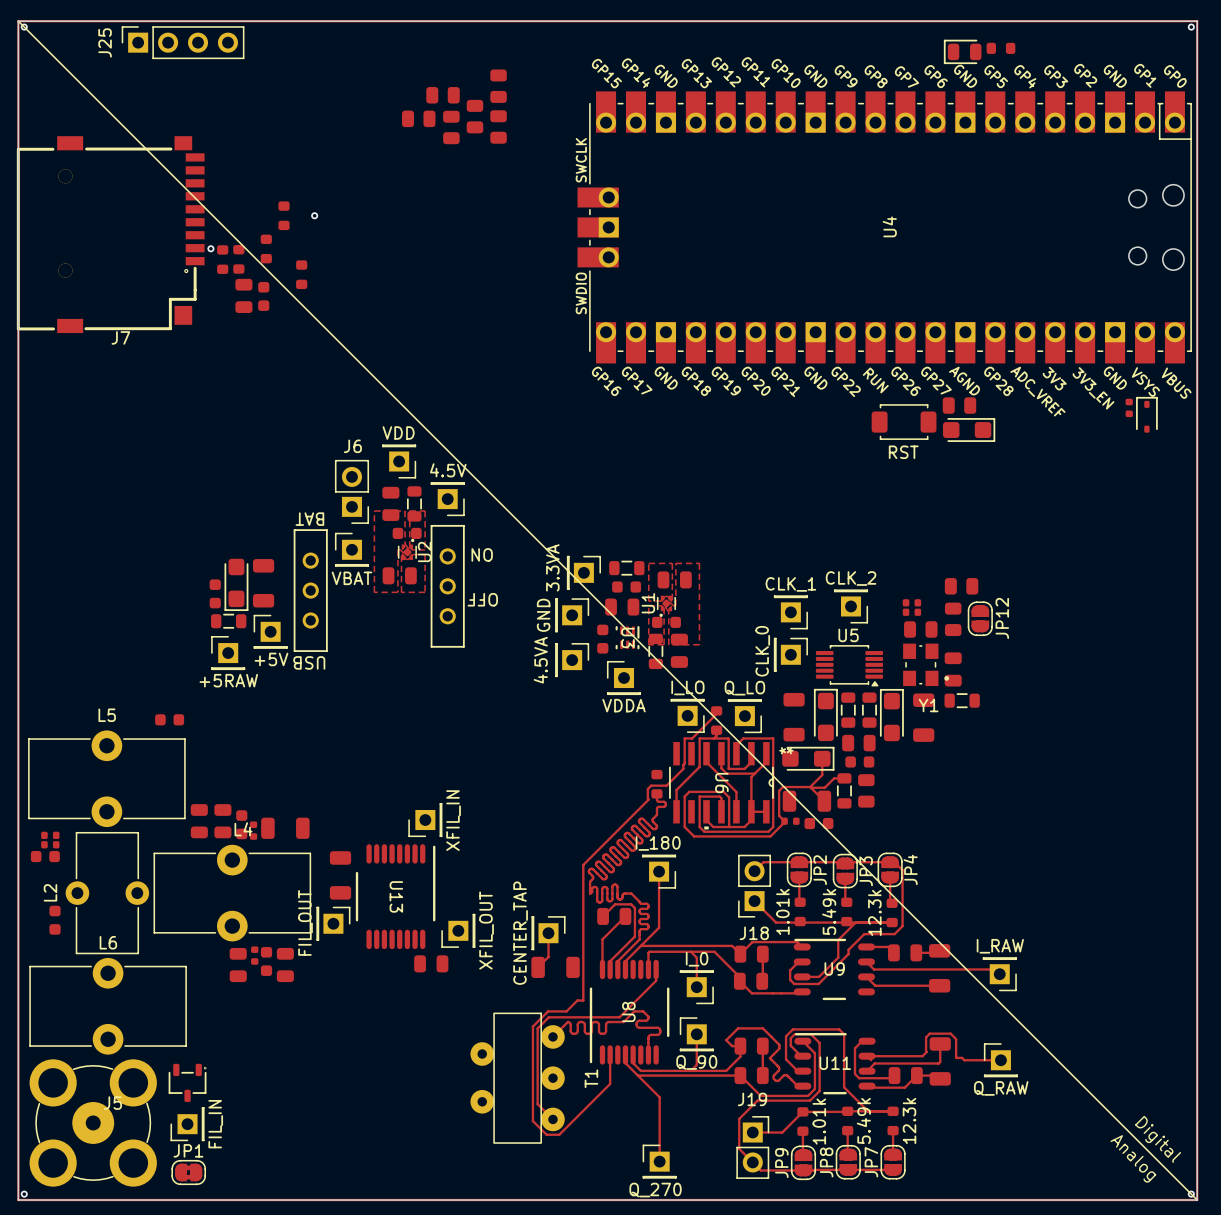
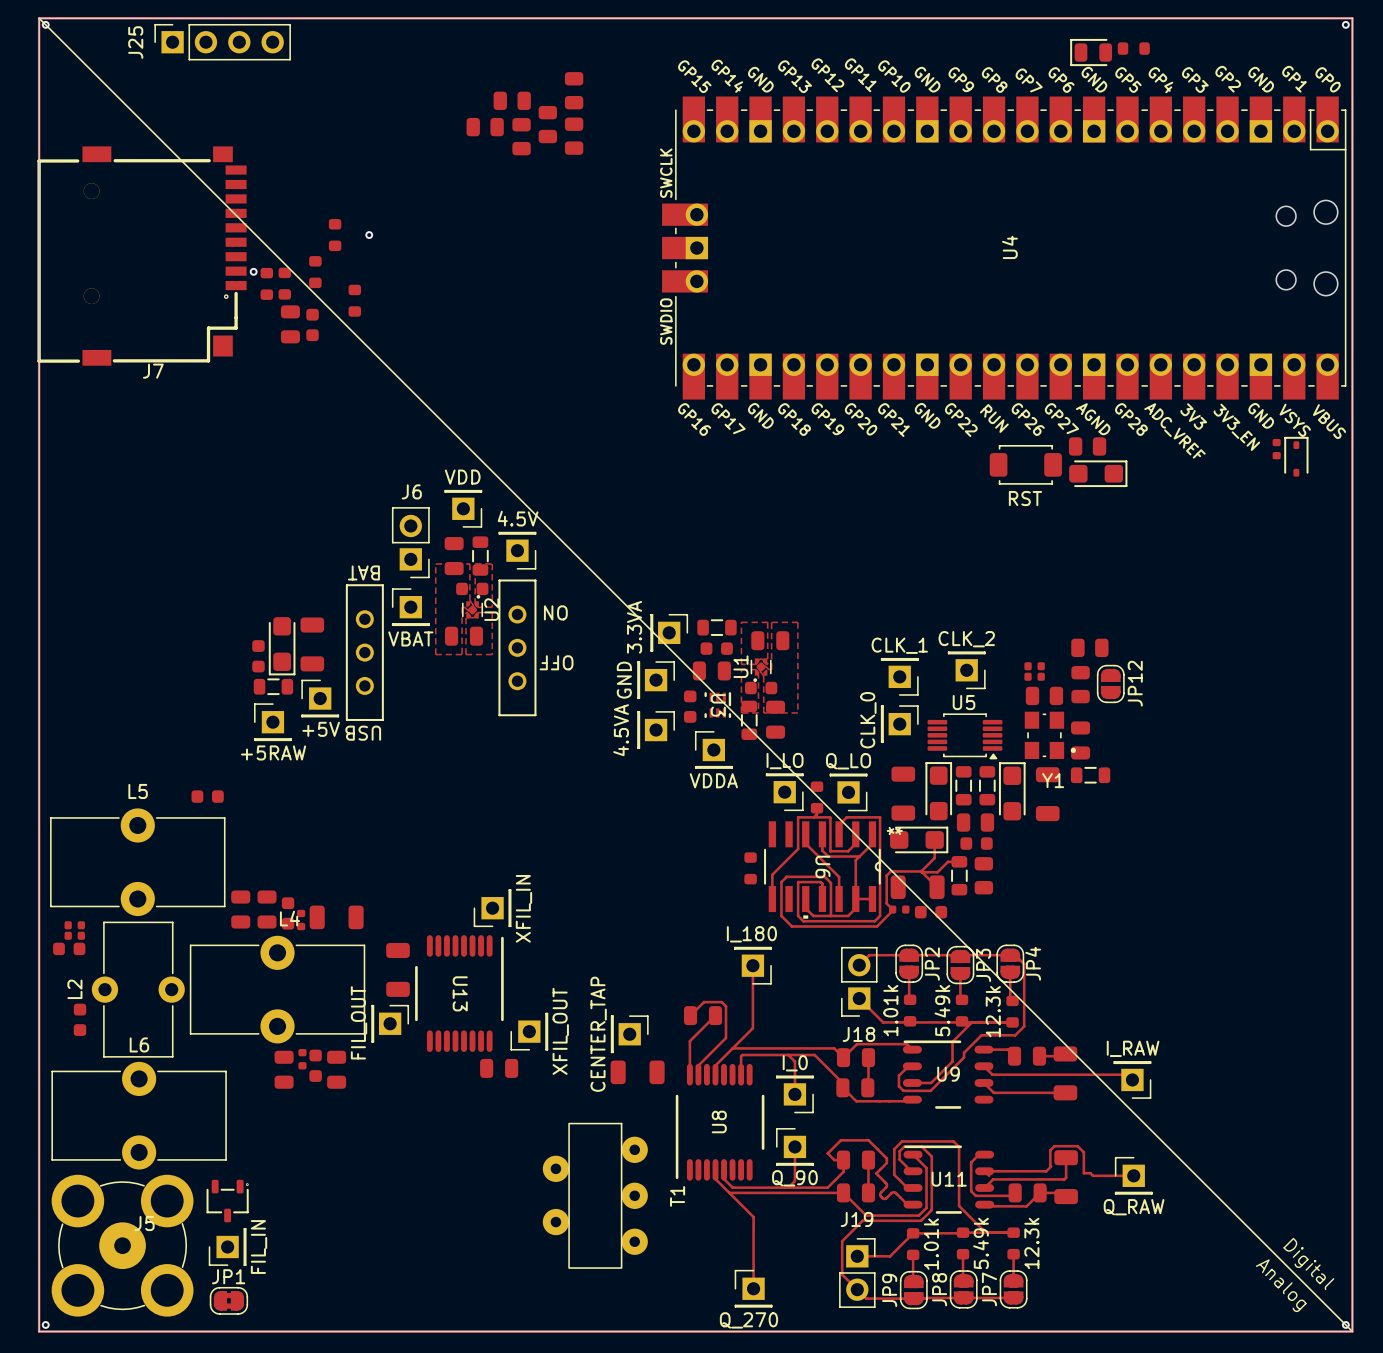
track: (716, 710) (716, 714) (692, 738) (684, 738) (683, 768) (666, 785) (651, 785) (647, 789) (648, 799) (583, 864) (583, 1000) (577, 1000) (566, 1011) (548, 1011) (532, 1026) (532, 1121) (546, 1134) (559, 1134) (610, 1083) (610, 1054) -> none
track: (656, 793) (657, 801) (664, 801) (665, 804) (657, 808) (656, 814) (652, 820) (656, 827) (653, 829) (640, 818) (639, 822) (649, 832) (649, 835) (645, 836) (633, 825) (632, 829) (642, 839) (642, 842) (638, 843) (626, 833) (624, 836) (635, 846) (634, 849) (631, 850) (619, 840) (617, 843) (627, 853) (627, 856) (624, 857) (612, 847) (610, 850) (620, 861) (620, 863) (617, 864) (605, 854) (603, 857) (613, 868) (613, 871) (610, 872) (599, 861) (595, 864) (606, 875) (605, 878) (602, 879) (592, 868) (588, 870) (593, 877) (590, 881) (590, 893) (592, 887) (596, 887) (598, 902) (602, 901) (604, 887) (607, 888) (607, 900) (611, 900) (612, 886) (615, 884) (617, 886) (618, 899) (621, 898) (623, 893) (631, 893) (640, 903) (648, 905) (647, 908) (639, 910) (640, 913) (648, 914) (647, 918) (640, 919) (639, 922) (647, 924) (648, 927) (640, 929) (639, 939) (617, 961) (617, 969) -> none
track: (548, 933) (548, 957) (538, 967) -> none
track: (656, 969) (656, 980) (619, 1017) (548, 1017) (537, 1028) (537, 1104) (552, 1119) -> none
track: (552, 1036) (567, 1022) (570, 1023) (572, 1033) (577, 1032) (577, 1023) (580, 1022) (584, 1023) (585, 1032) (590, 1033) (592, 1023) (596, 1022) (598, 1023) (599, 1032) (603, 1033) (607, 1022) (623, 1022) (634, 1011) (643, 1011) (648, 1018) (637, 1021) (637, 1026) (657, 1027) (660, 1030) (658, 1034) (648, 1036) (648, 1054) -> none

